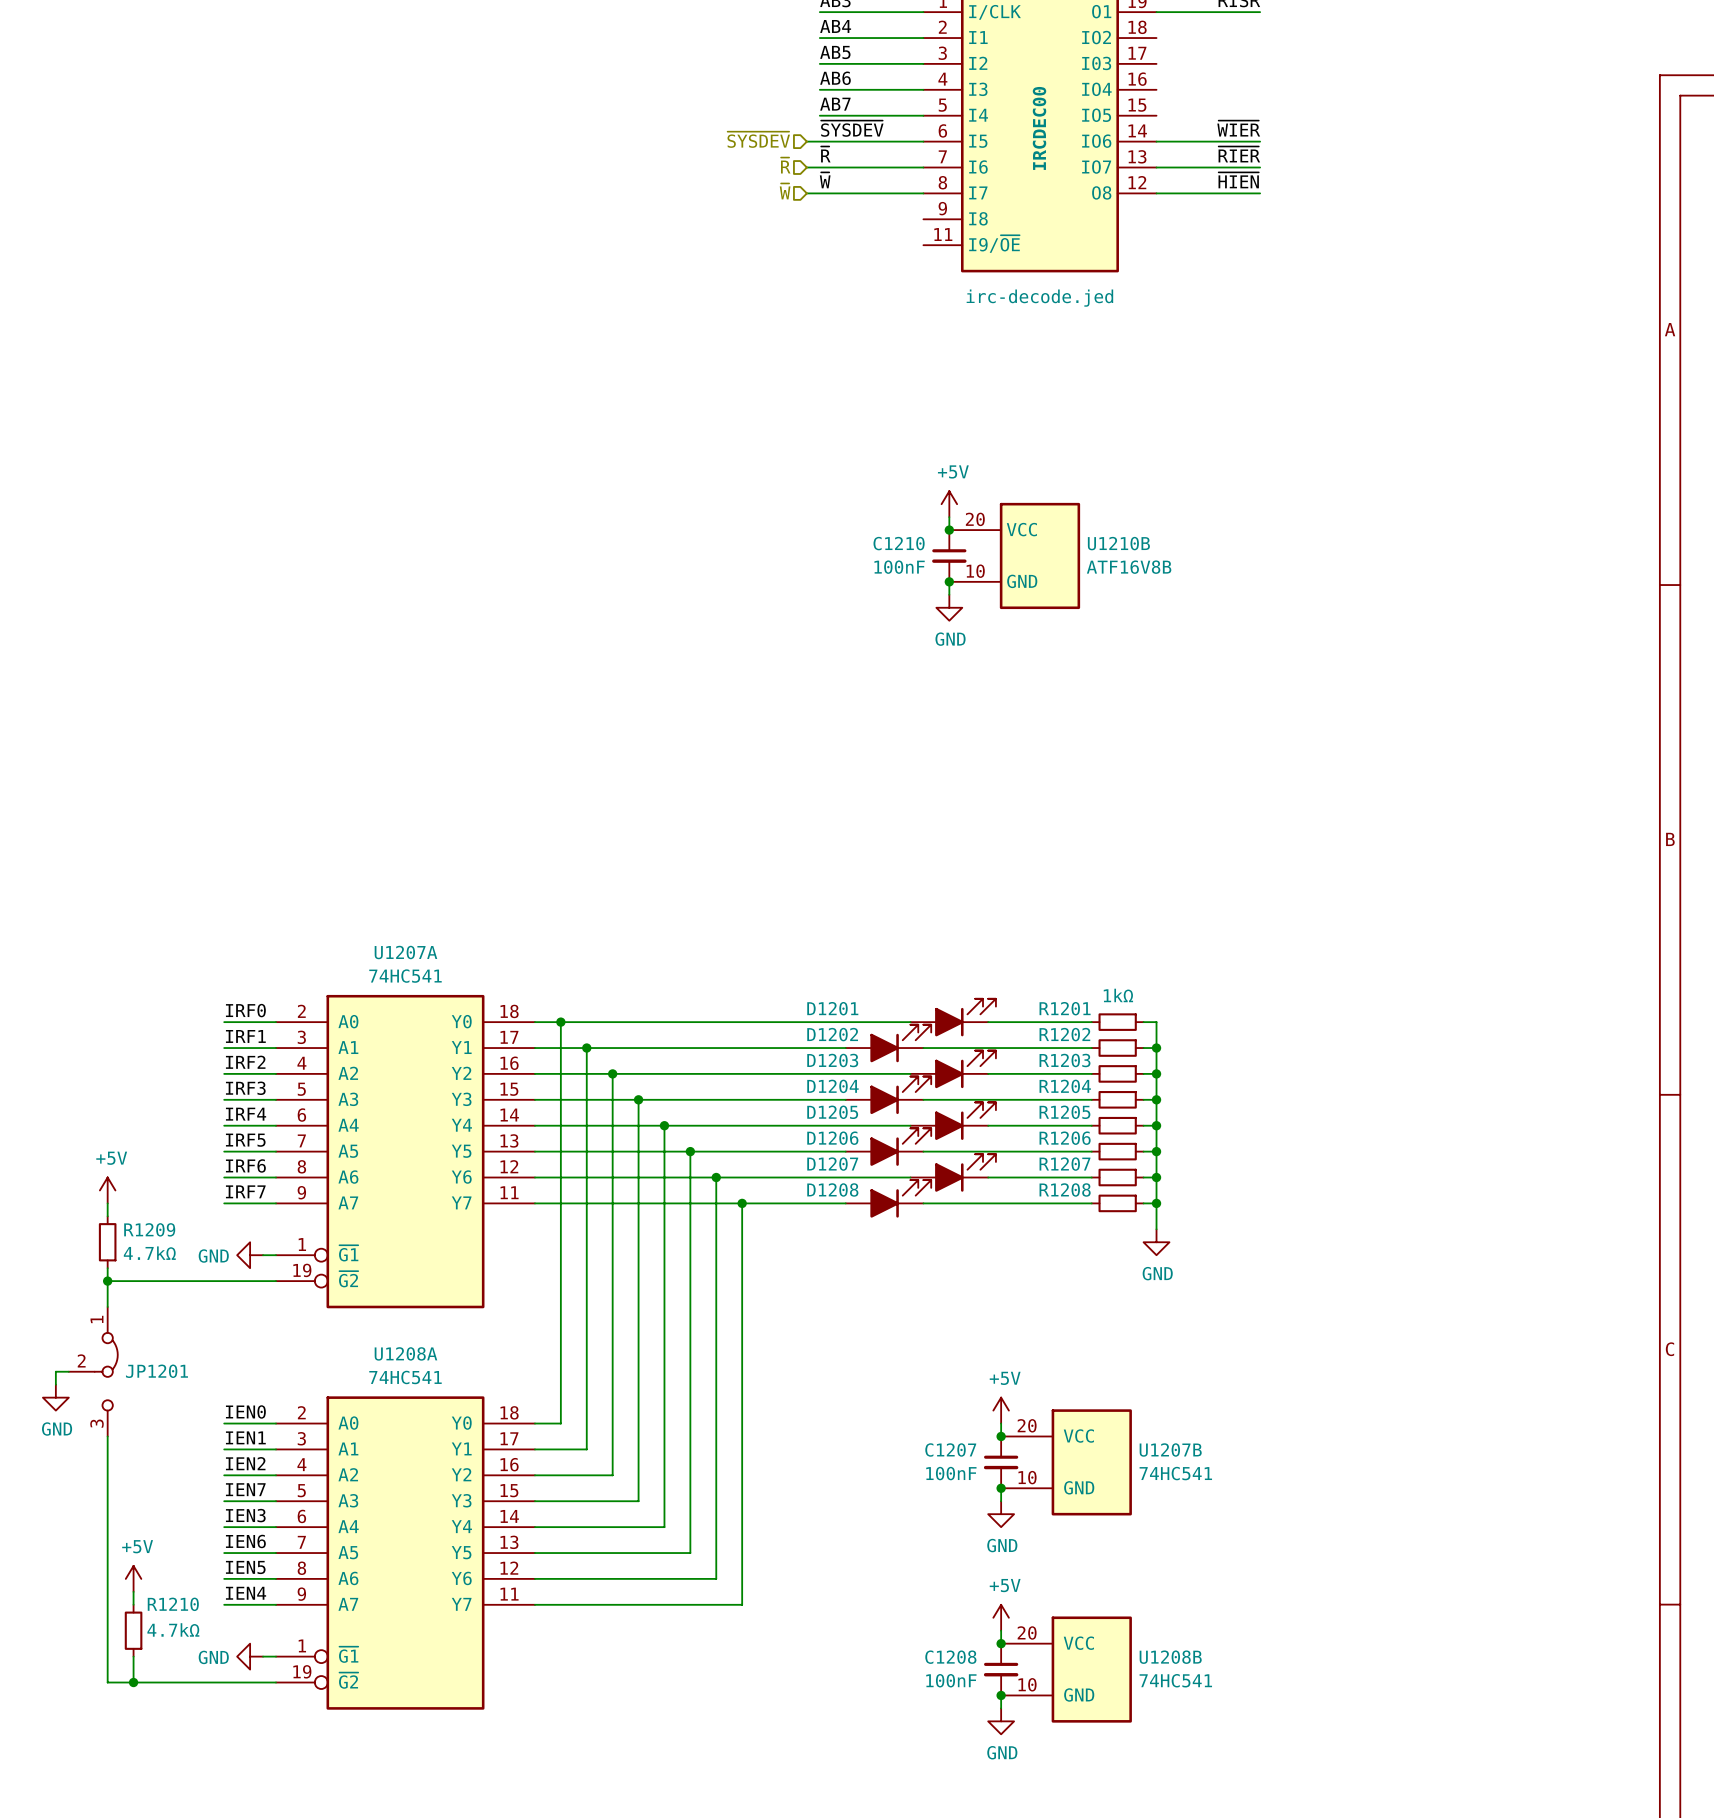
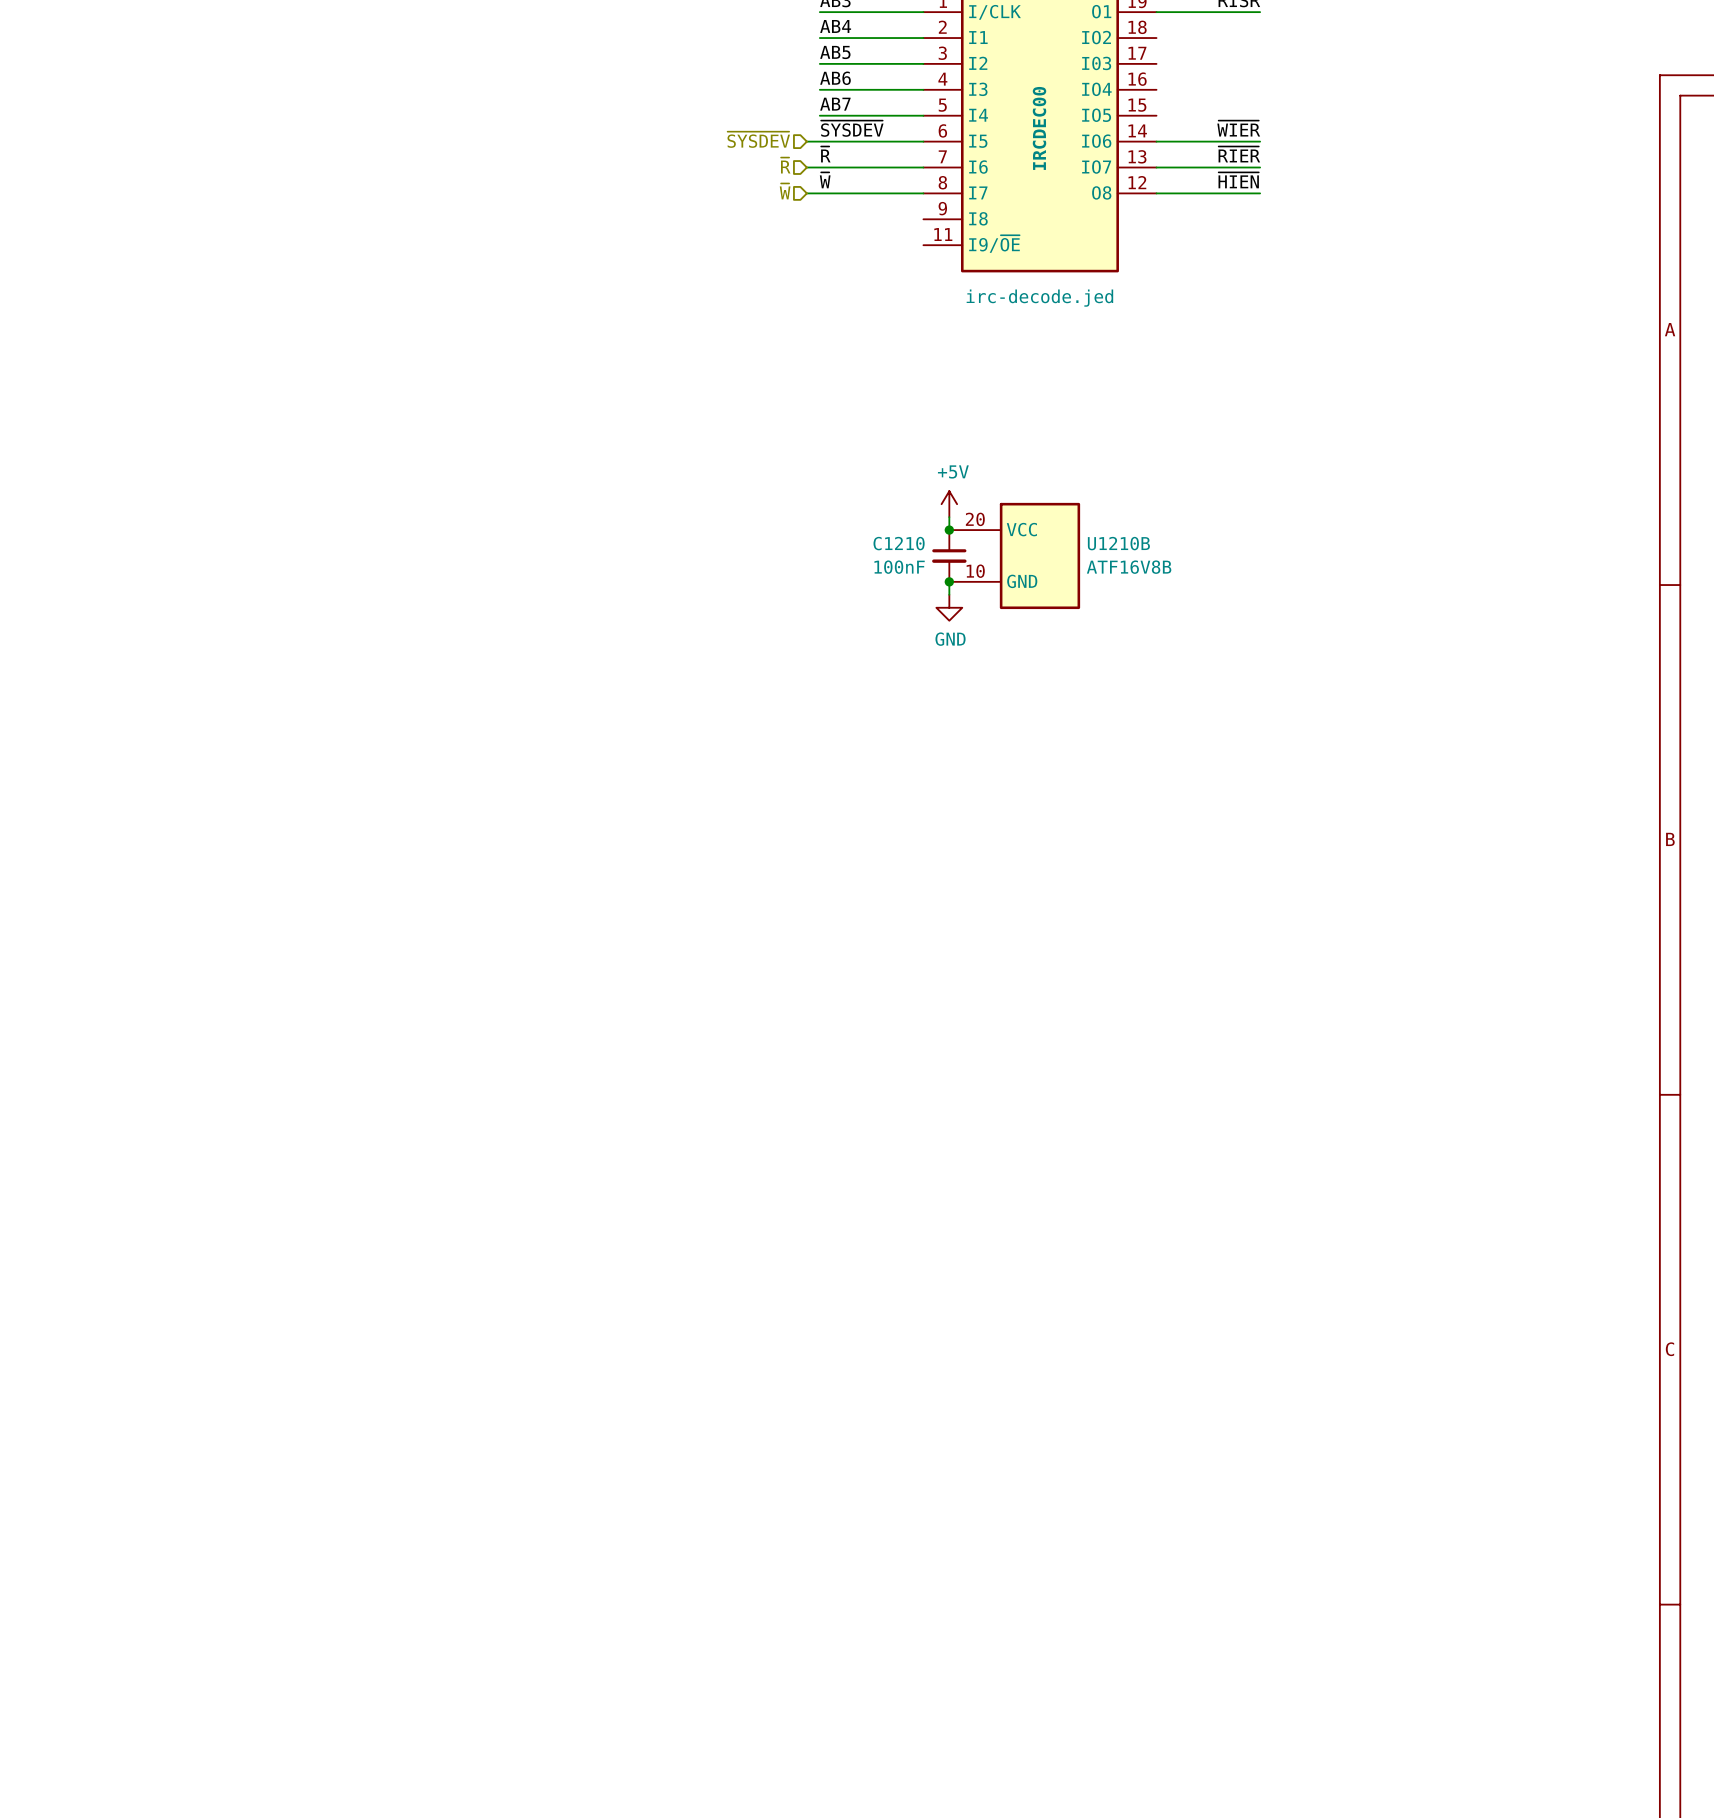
label: IRF0 (245, 1010) -> none
D1201: (953, 1017) -> none
wire: (224, 1022) (276, 1022) -> none
wire: (534, 1022) (910, 1022) -> none
wire: (560, 1022) (560, 1423) (534, 1423) -> none
junction: (560, 1022) -> none
wire: (988, 1022) (1091, 1022) -> none
R1201: 1kΩ (1117, 1022) -> none
wire: (1143, 1022) (1156, 1022) (1156, 1229) -> none
label: IRF1 (245, 1036) -> none
D1202: (888, 1043) -> none
wire: (224, 1048) (276, 1048) -> none
wire: (534, 1048) (845, 1048) -> none
wire: (586, 1048) (586, 1449) (534, 1449) -> none
junction: (586, 1048) -> none
wire: (923, 1048) (1091, 1048) -> none
R1202: (1117, 1048) -> none
wire: (1143, 1048) (1156, 1048) -> none
junction: (1156, 1048) -> none
label: IRF2 (245, 1062) -> none
D1203: (953, 1069) -> none
wire: (224, 1073) (276, 1073) -> none
wire: (534, 1073) (910, 1073) -> none
wire: (612, 1073) (612, 1475) (534, 1475) -> none
junction: (612, 1073) -> none
wire: (988, 1073) (1091, 1073) -> none
R1203: (1117, 1073) -> none
wire: (1143, 1073) (1156, 1073) -> none
junction: (1156, 1073) -> none
label: IRF3 (245, 1088) -> none
D1204: (888, 1095) -> none
wire: (224, 1099) (276, 1099) -> none
wire: (534, 1099) (845, 1099) -> none
wire: (638, 1099) (638, 1501) (534, 1501) -> none
junction: (638, 1099) -> none
wire: (923, 1099) (1091, 1099) -> none
R1204: (1117, 1099) -> none
wire: (1143, 1099) (1156, 1099) -> none
junction: (1156, 1099) -> none
label: IRF4 (246, 1114) -> none
D1205: (953, 1121) -> none
wire: (224, 1125) (276, 1125) -> none
wire: (534, 1125) (910, 1125) -> none
wire: (664, 1125) (664, 1527) (534, 1527) -> none
junction: (664, 1125) -> none
wire: (988, 1125) (1091, 1125) -> none
R1205: (1117, 1125) -> none
wire: (1143, 1125) (1156, 1125) -> none
junction: (1156, 1125) -> none
label: IRF5 (245, 1140) -> none
D1206: (888, 1147) -> none
wire: (224, 1151) (276, 1151) -> none
U1207A: 74HC541 (405, 1151) -> none
wire: (534, 1151) (845, 1151) -> none
wire: (690, 1151) (690, 1553) (534, 1553) -> none
junction: (690, 1151) -> none
wire: (923, 1151) (1091, 1151) -> none
R1206: (1117, 1151) -> none
wire: (1143, 1151) (1156, 1151) -> none
junction: (1156, 1151) -> none
label: IRF6 (245, 1165) -> none
D1207: (953, 1172) -> none
wire: (224, 1177) (276, 1177) -> none
wire: (534, 1177) (910, 1177) -> none
wire: (716, 1177) (716, 1578) (534, 1578) -> none
junction: (716, 1177) -> none
wire: (988, 1177) (1091, 1177) -> none
R1207: (1117, 1177) -> none
wire: (1143, 1177) (1156, 1177) -> none
junction: (1156, 1177) -> none
power symbol: +5V (107, 1190) -> none
label: IRF7 (245, 1191) -> none
D1208: (888, 1198) -> none
wire: (107, 1203) (107, 1216) -> none
wire: (224, 1203) (276, 1203) -> none
wire: (534, 1203) (845, 1203) -> none
wire: (742, 1203) (742, 1604) (534, 1604) -> none
junction: (742, 1203) -> none
wire: (923, 1203) (1091, 1203) -> none
R1208: (1117, 1203) -> none
wire: (1143, 1203) (1156, 1203) -> none
junction: (1156, 1203) -> none
R1209: 4.7kΩ (107, 1242) -> none
power symbol: GND (1156, 1242) -> none
power symbol: GND (250, 1255) -> none
wire: (263, 1255) (276, 1255) -> none
wire: (107, 1268) (107, 1306) -> none
wire: (107, 1281) (276, 1281) -> none
junction: (107, 1281) -> none
wire: (68, 1371) (55, 1371) (55, 1384) -> none
JP1201: (93, 1371) -> none
power symbol: GND (55, 1397) -> none
power symbol: +5V (1001, 1410) -> none
label: IEN0 (245, 1411) -> none
wire: (224, 1423) (276, 1423) -> none
wire: (1001, 1423) (1001, 1436) -> none
wire: (107, 1436) (107, 1682) (276, 1682) -> none
junction: (1001, 1436) -> none
label: IEN1 (245, 1437) -> none
wire: (224, 1449) (276, 1449) -> none
C1207: 100nF (1001, 1462) -> none
U1207B: 74HC541 (1066, 1462) -> none
label: IEN2 (245, 1463) -> none
wire: (224, 1475) (276, 1475) -> none
wire: (1001, 1488) (1001, 1501) -> none
junction: (1001, 1488) -> none
label: IEN7 (245, 1489) -> none
wire: (224, 1501) (276, 1501) -> none
power symbol: GND (1001, 1514) -> none
label: IEN3 (245, 1515) -> none
wire: (224, 1527) (276, 1527) -> none
label: IEN6 (245, 1541) -> none
wire: (224, 1553) (276, 1553) -> none
U1208A: 74HC541 (405, 1553) -> none
label: IEN5 (245, 1567) -> none
power symbol: +5V (133, 1578) -> none
wire: (224, 1578) (276, 1578) -> none
wire: (133, 1591) (133, 1604) -> none
label: IEN4 (246, 1593) -> none
wire: (224, 1604) (276, 1604) -> none
power symbol: +5V (1001, 1617) -> none
R1210: 4.7kΩ (133, 1630) -> none
wire: (1001, 1630) (1001, 1643) -> none
junction: (1001, 1643) -> none
wire: (133, 1656) (133, 1682) -> none
power symbol: GND (250, 1656) -> none
wire: (263, 1656) (276, 1656) -> none
C1208: 100nF (1001, 1669) -> none
U1208B: 74HC541 (1066, 1669) -> none
junction: (133, 1682) -> none
wire: (1001, 1695) (1001, 1708) -> none
junction: (1001, 1695) -> none
power symbol: GND (1001, 1721) -> none

